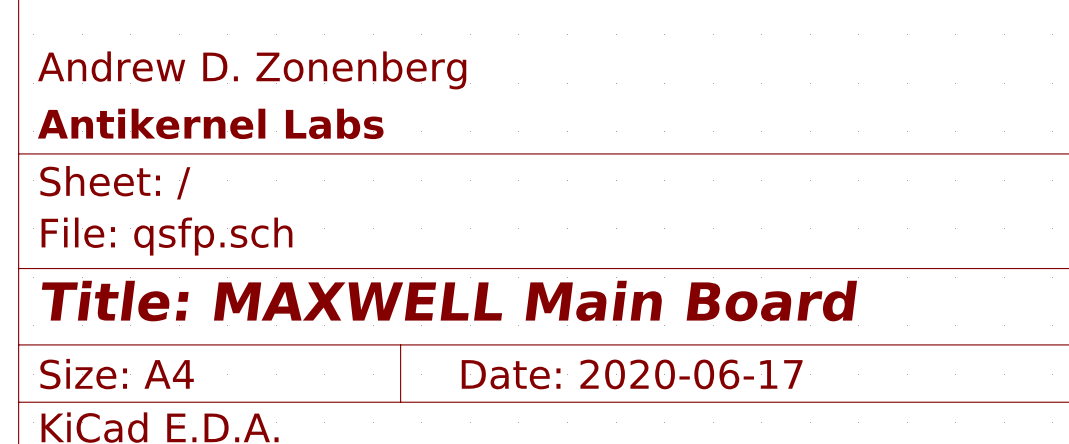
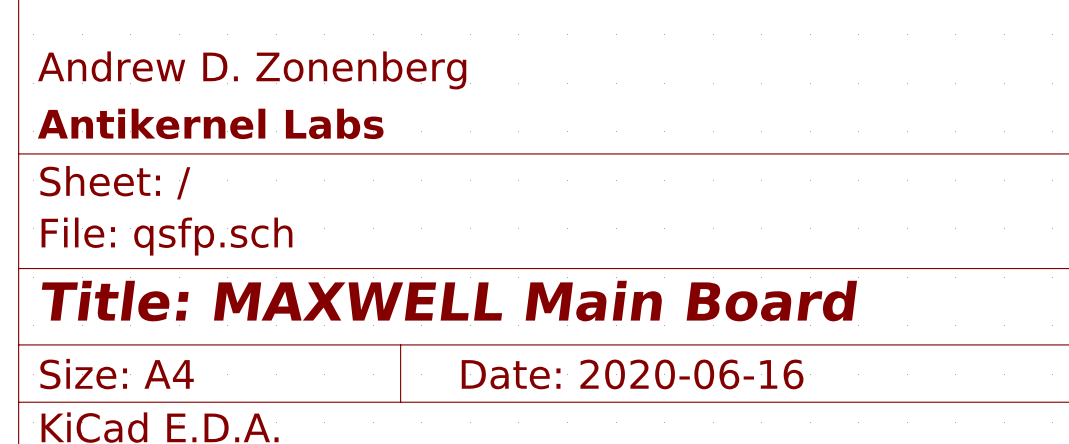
title block: Date: 2020-06-17 (632, 374) -> Date: 2020-06-16 (632, 374)

